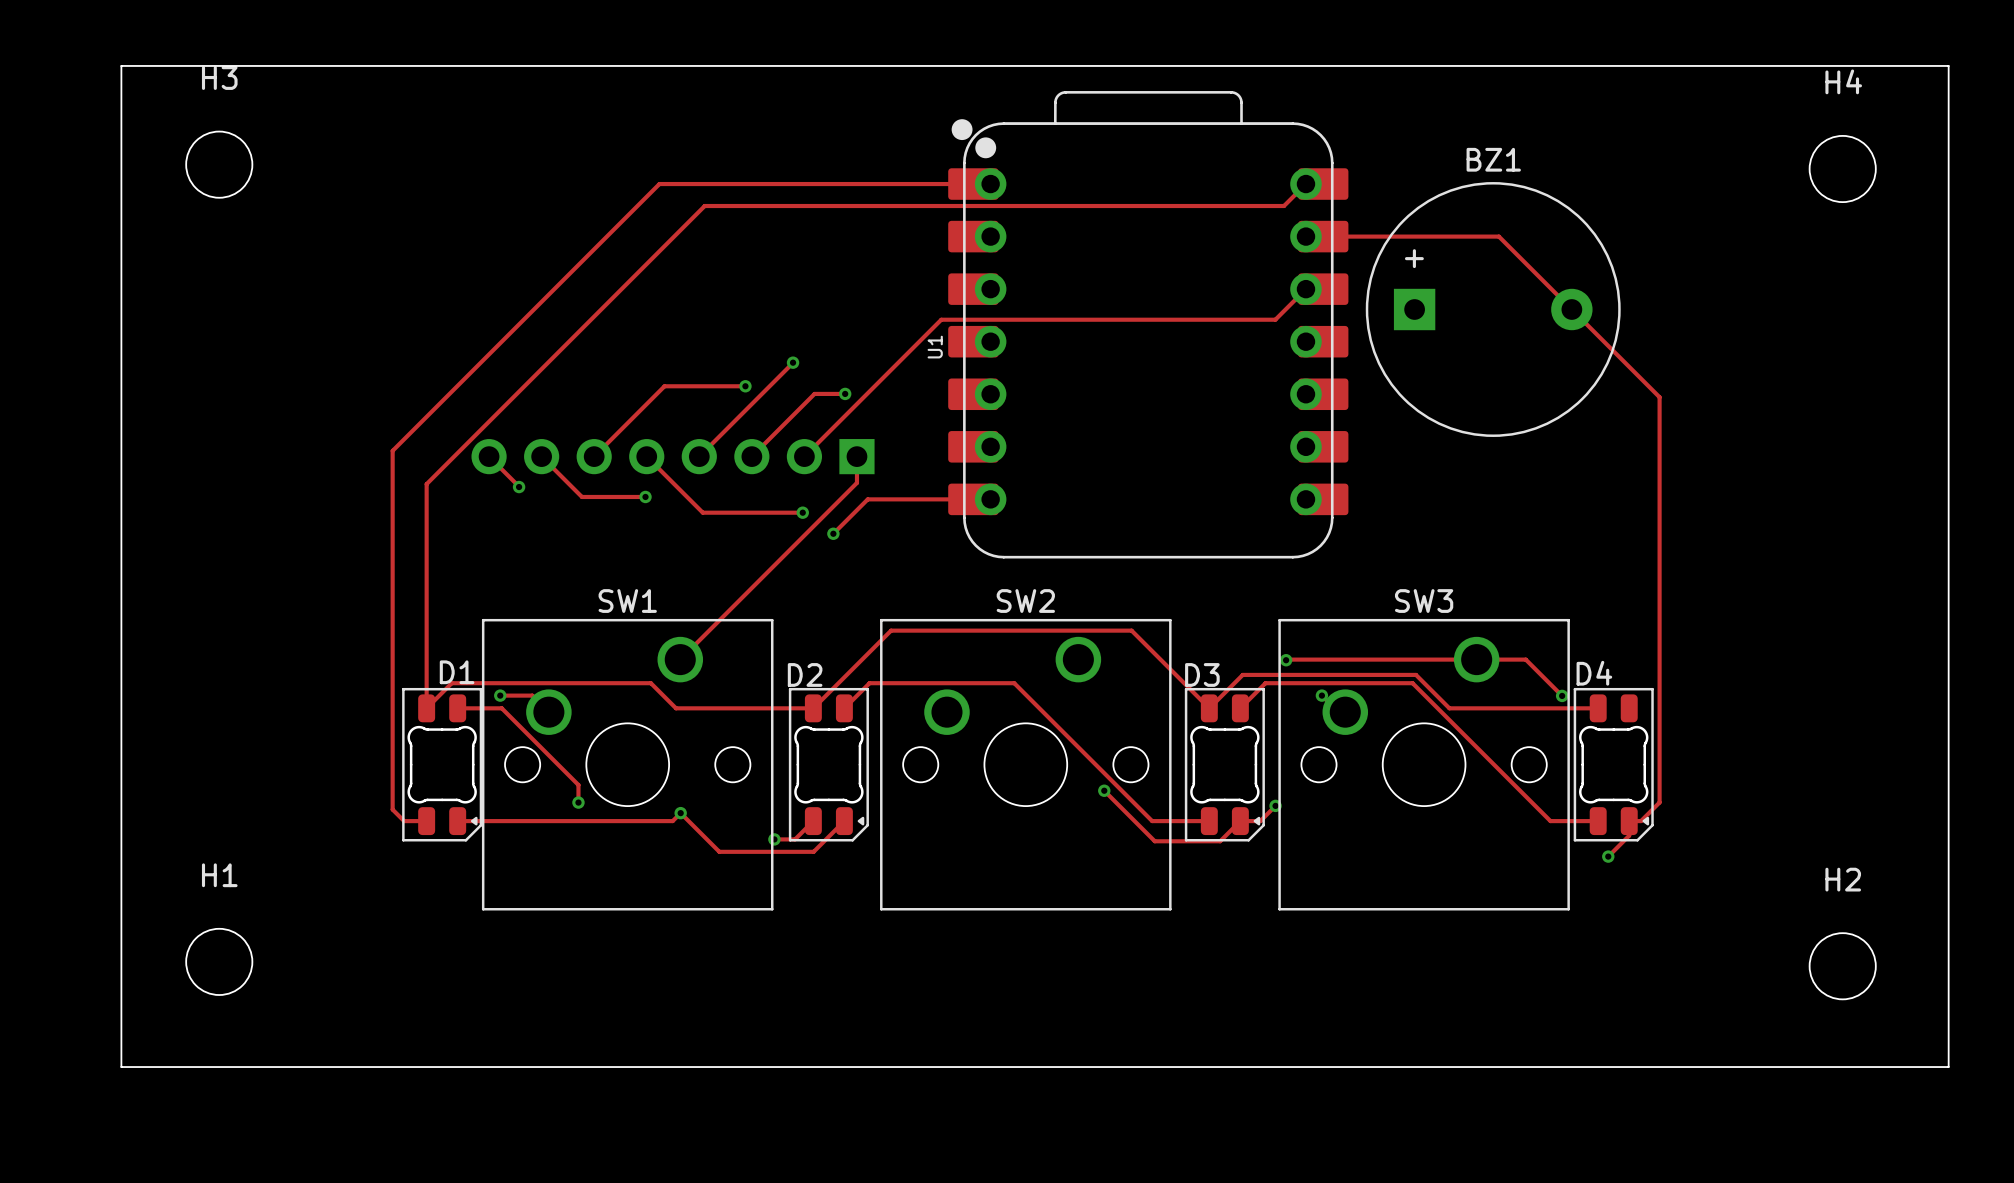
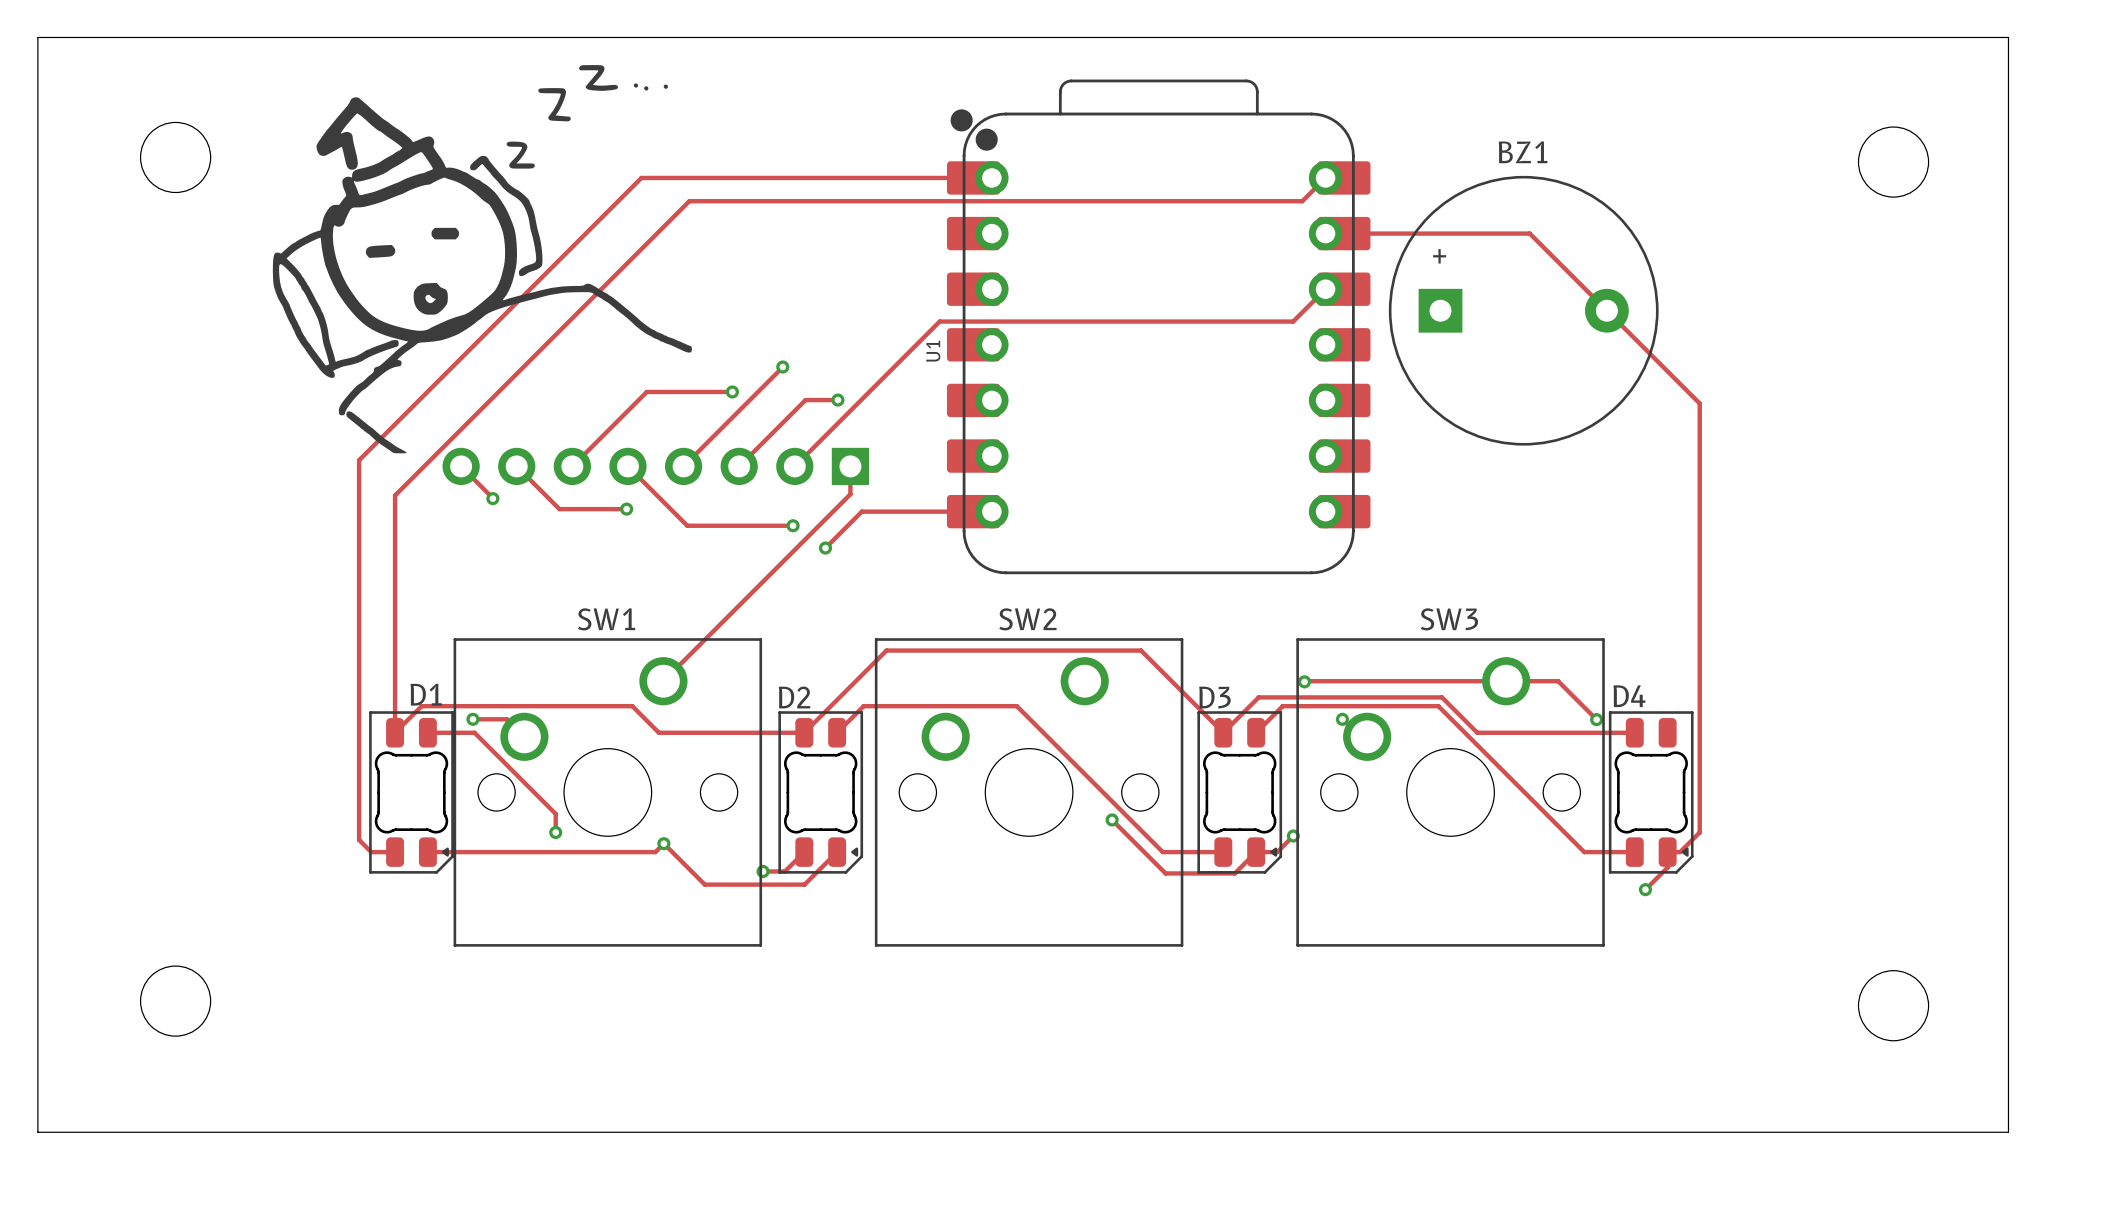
board edge: (121, 65) (1948, 65) (1948, 1067) (121, 1067) (121, 65) -> (37, 37) (37, 1132) (2008, 1132) (2008, 37) (37, 37)
drawing: none -> [272, 65, 692, 454]
H3 name: H3 (219, 78) -> none
H4 name: H4 (1843, 81) -> none
H1 name: H1 (219, 875) -> none
H2 name: H2 (1843, 879) -> none

